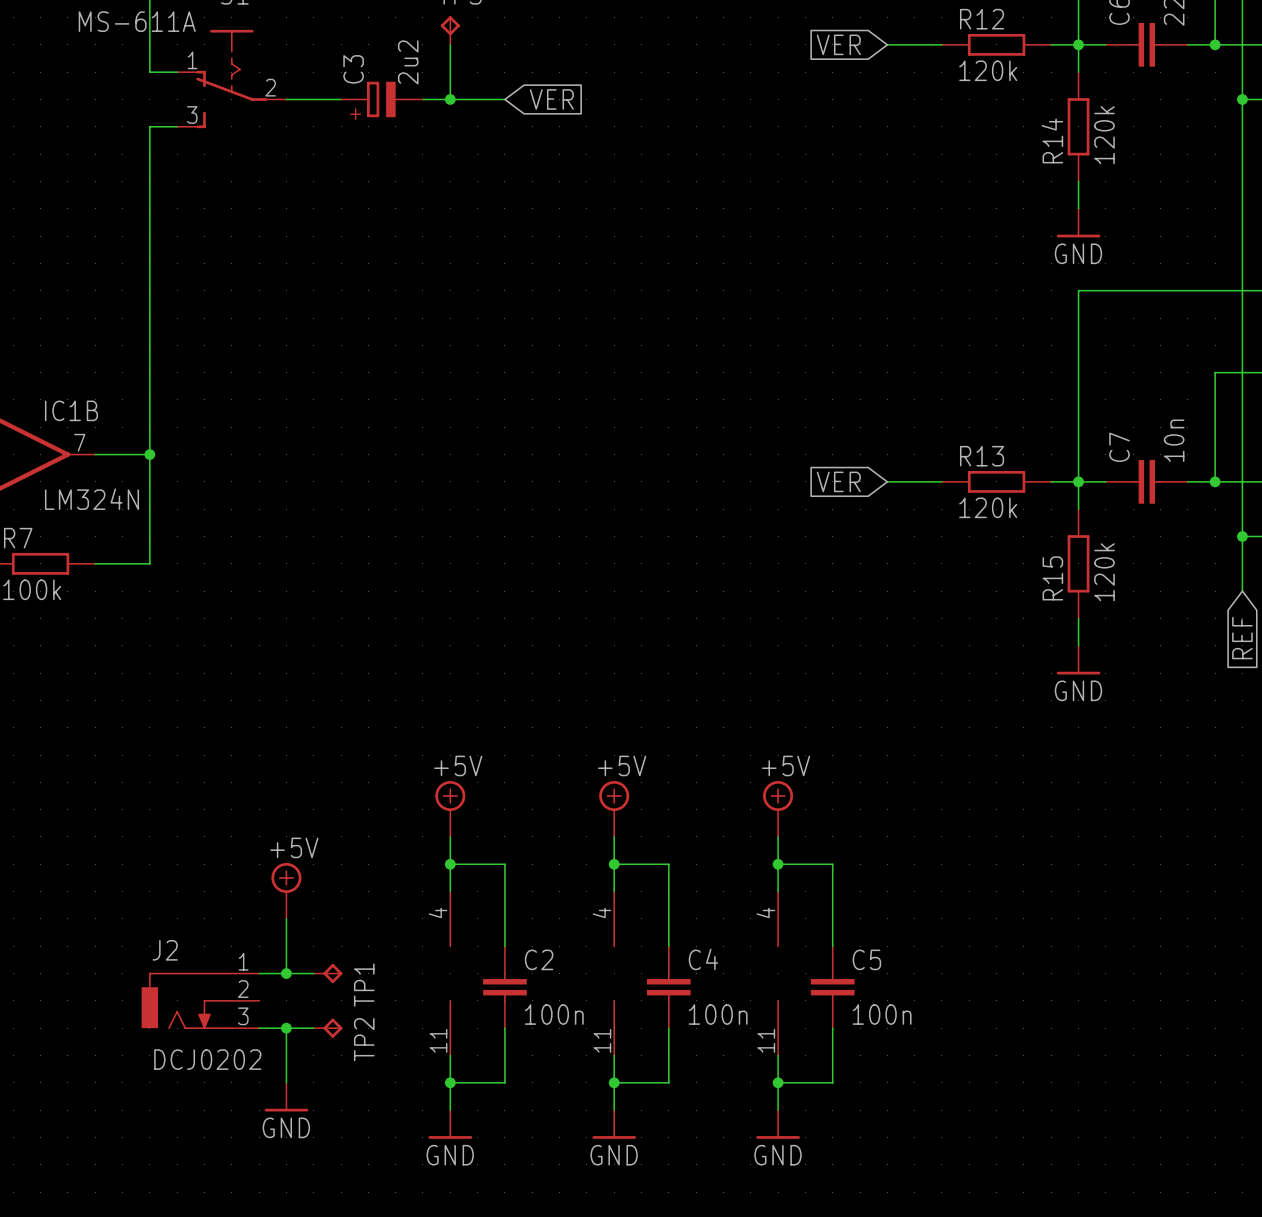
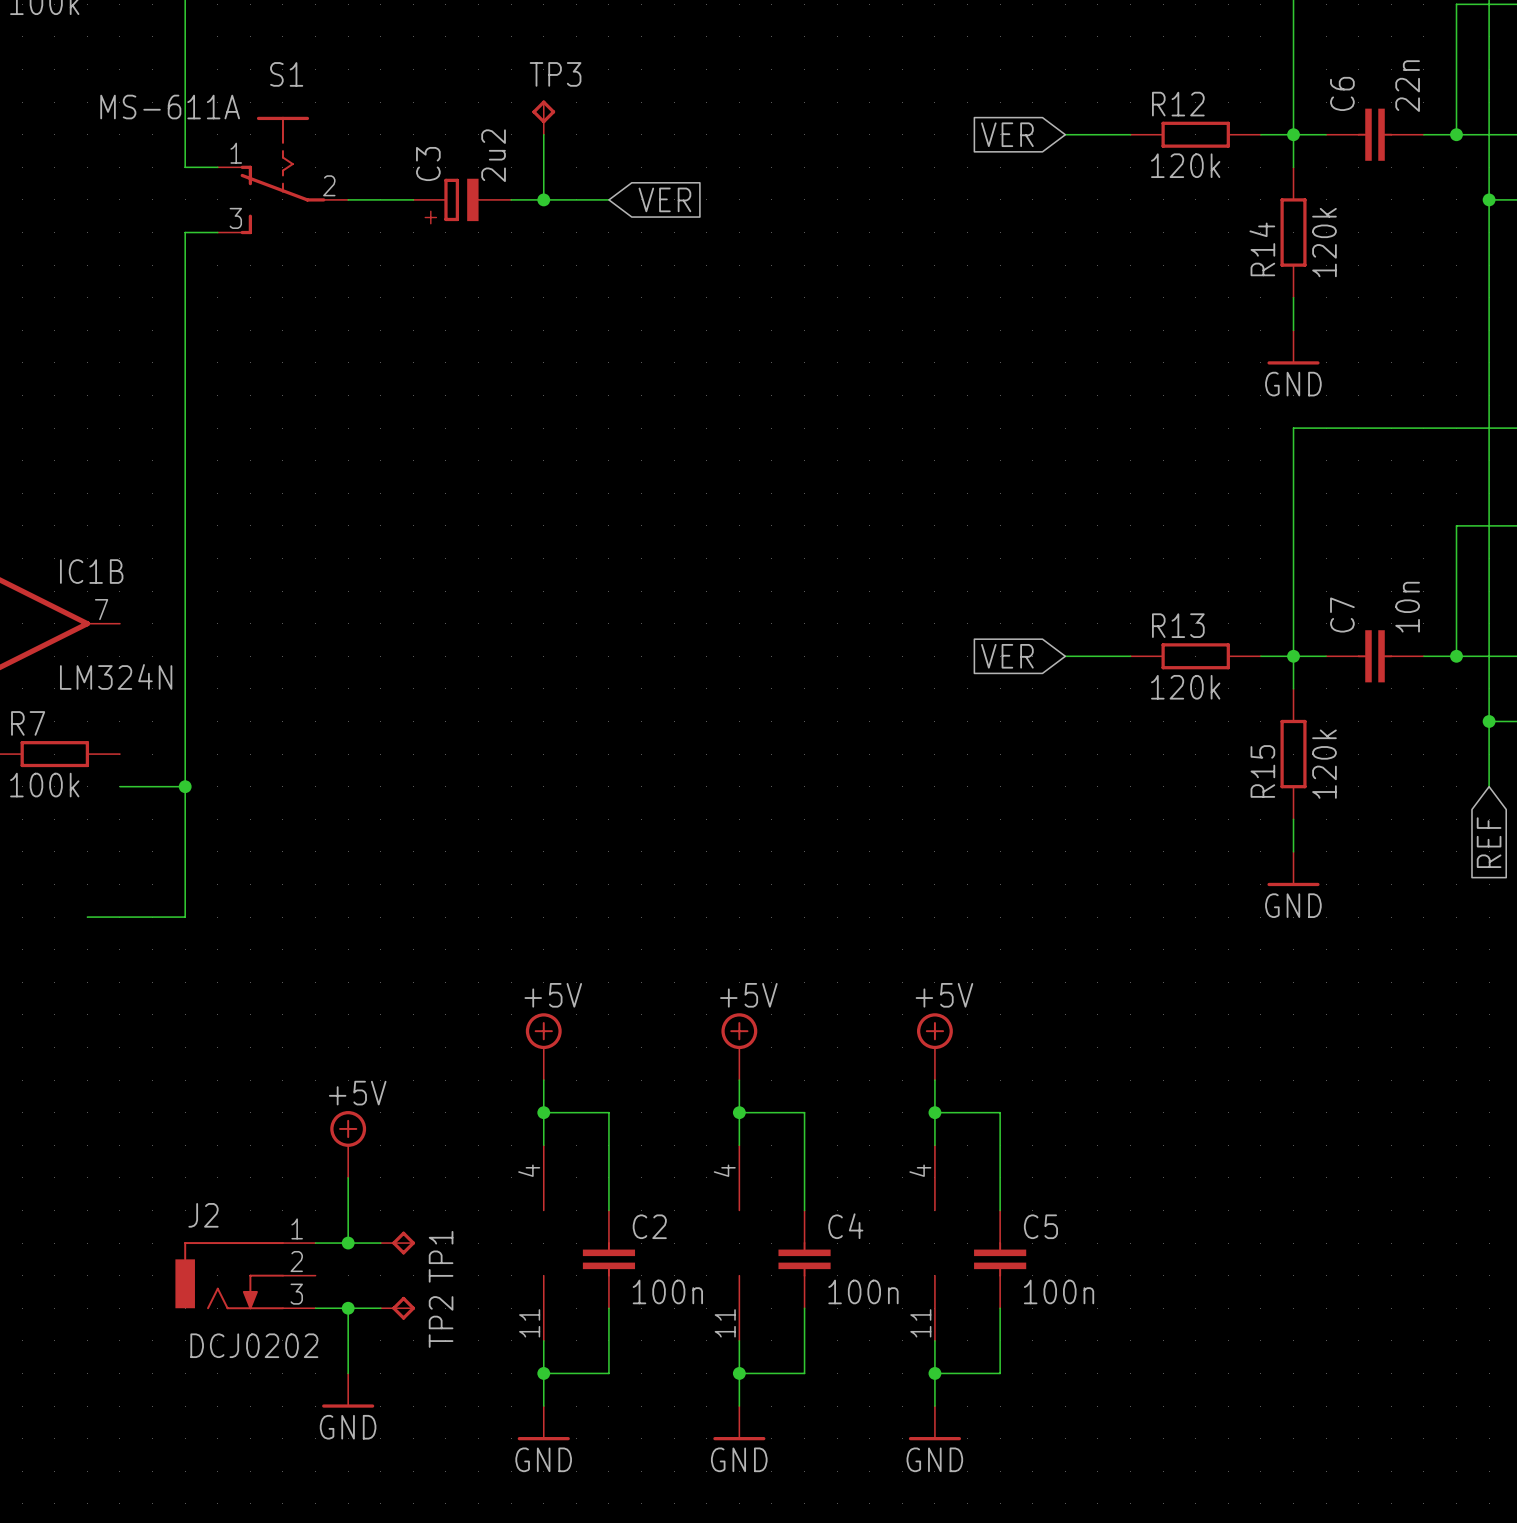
wire: (95, 454) (149, 454) -> (119, 786) (185, 786)
junction: (149, 454) -> none
wire: (95, 563) (149, 563) -> (87, 917) (185, 917) (185, 754)
junction: none -> (185, 786)

